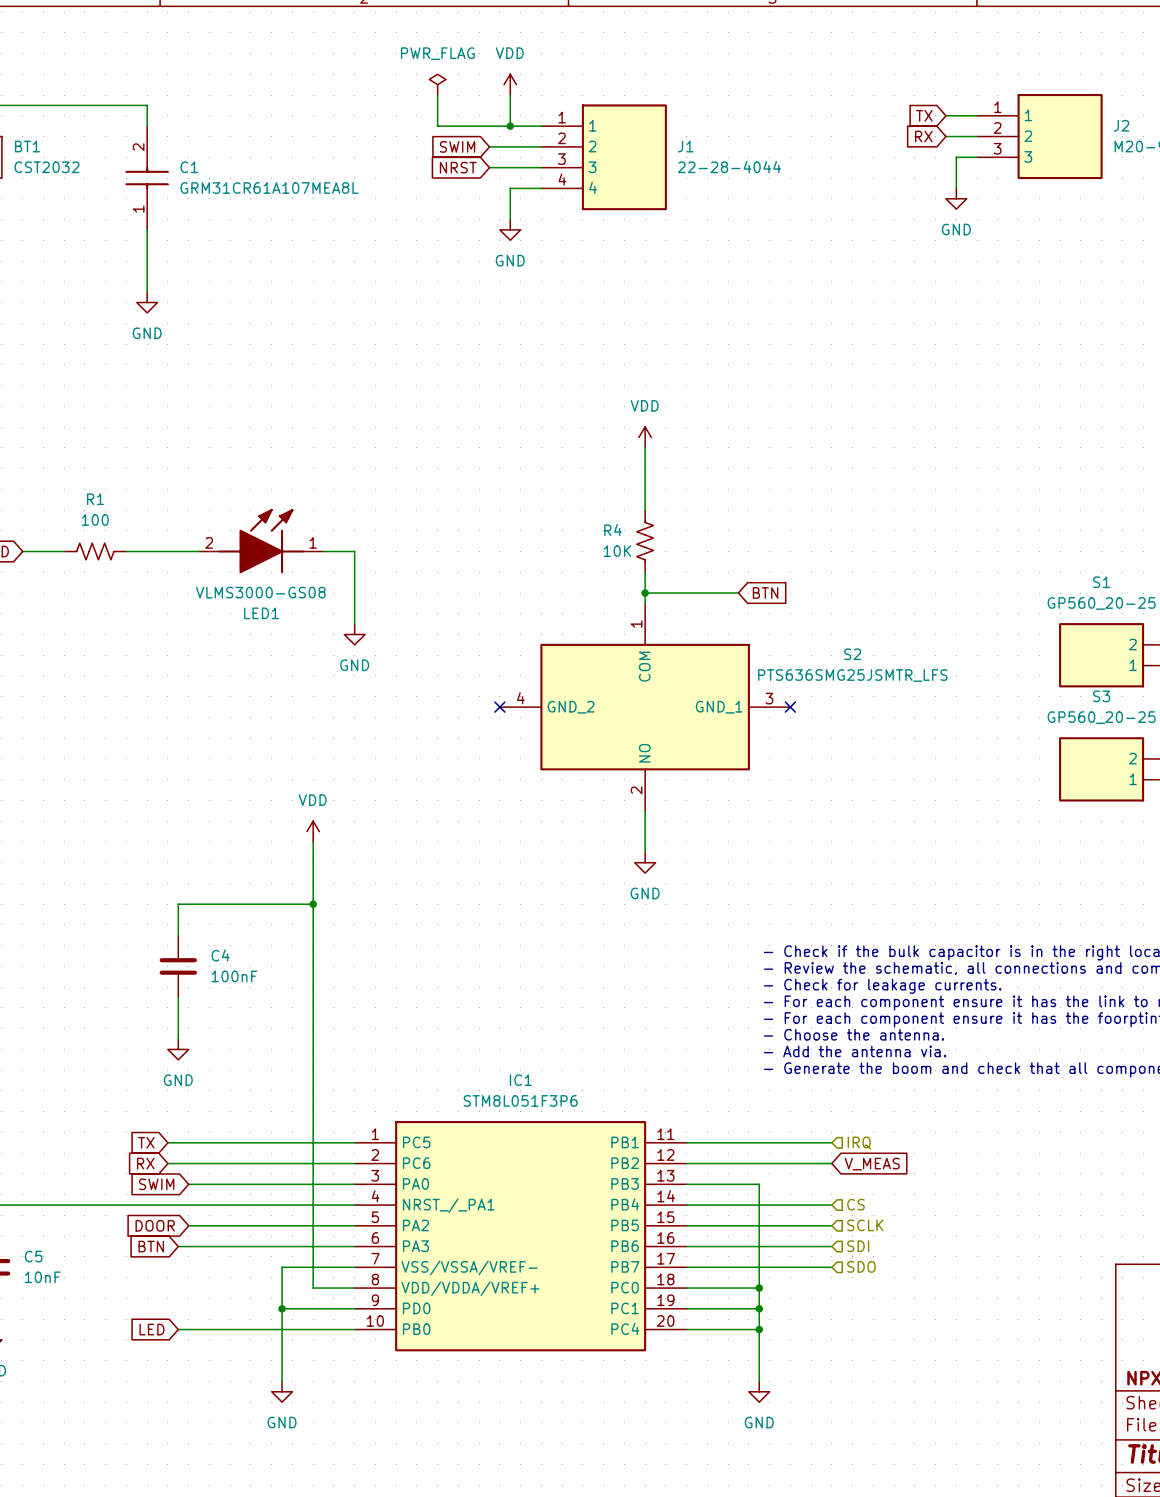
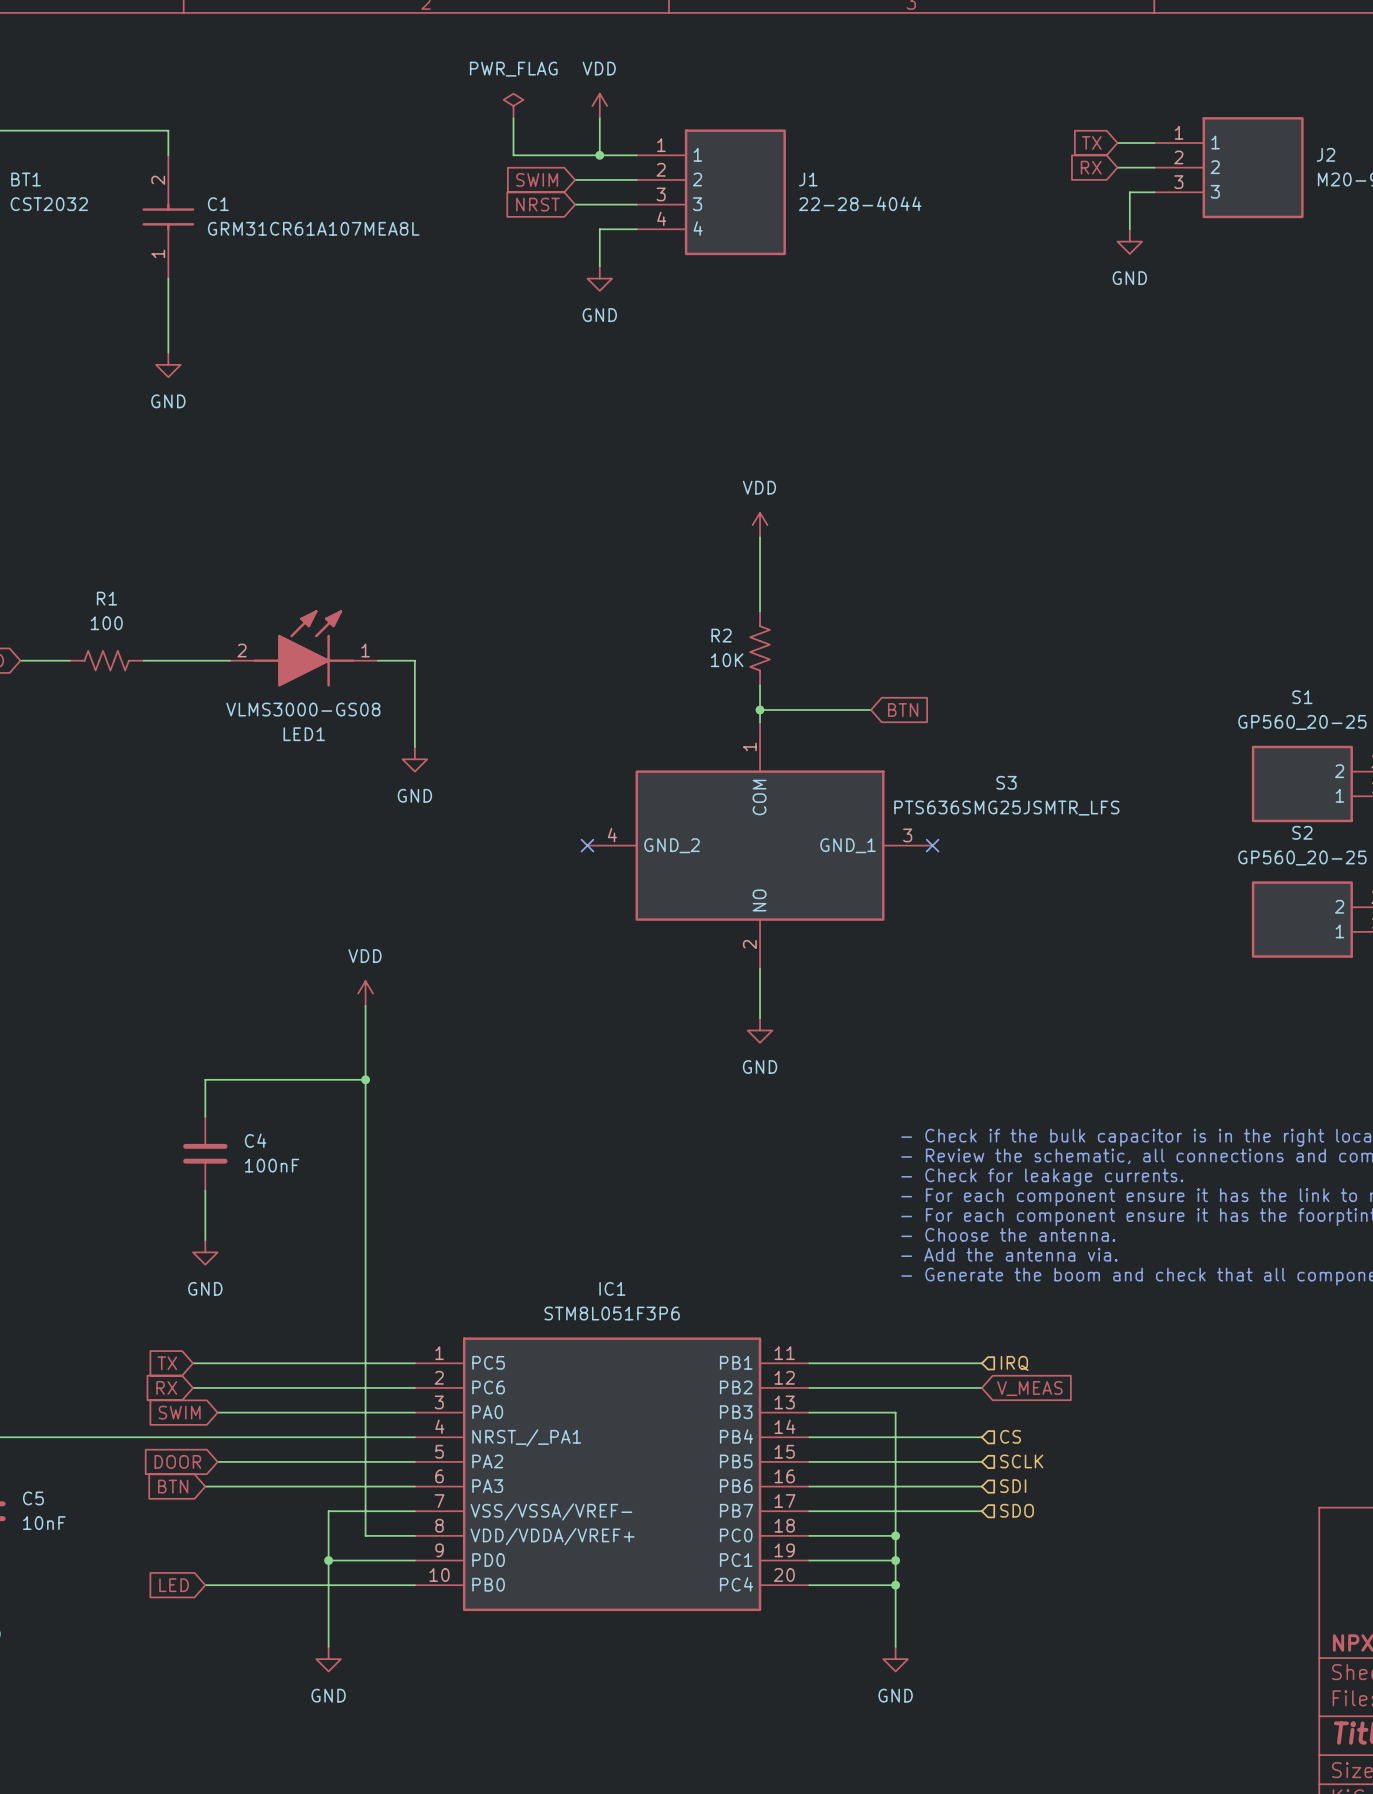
R4 name: R4 (613, 530) -> R2 (721, 635)
S2 name: S2 (852, 654) -> S3 (1006, 782)
S3 name: S3 (1101, 696) -> S2 (1302, 832)

